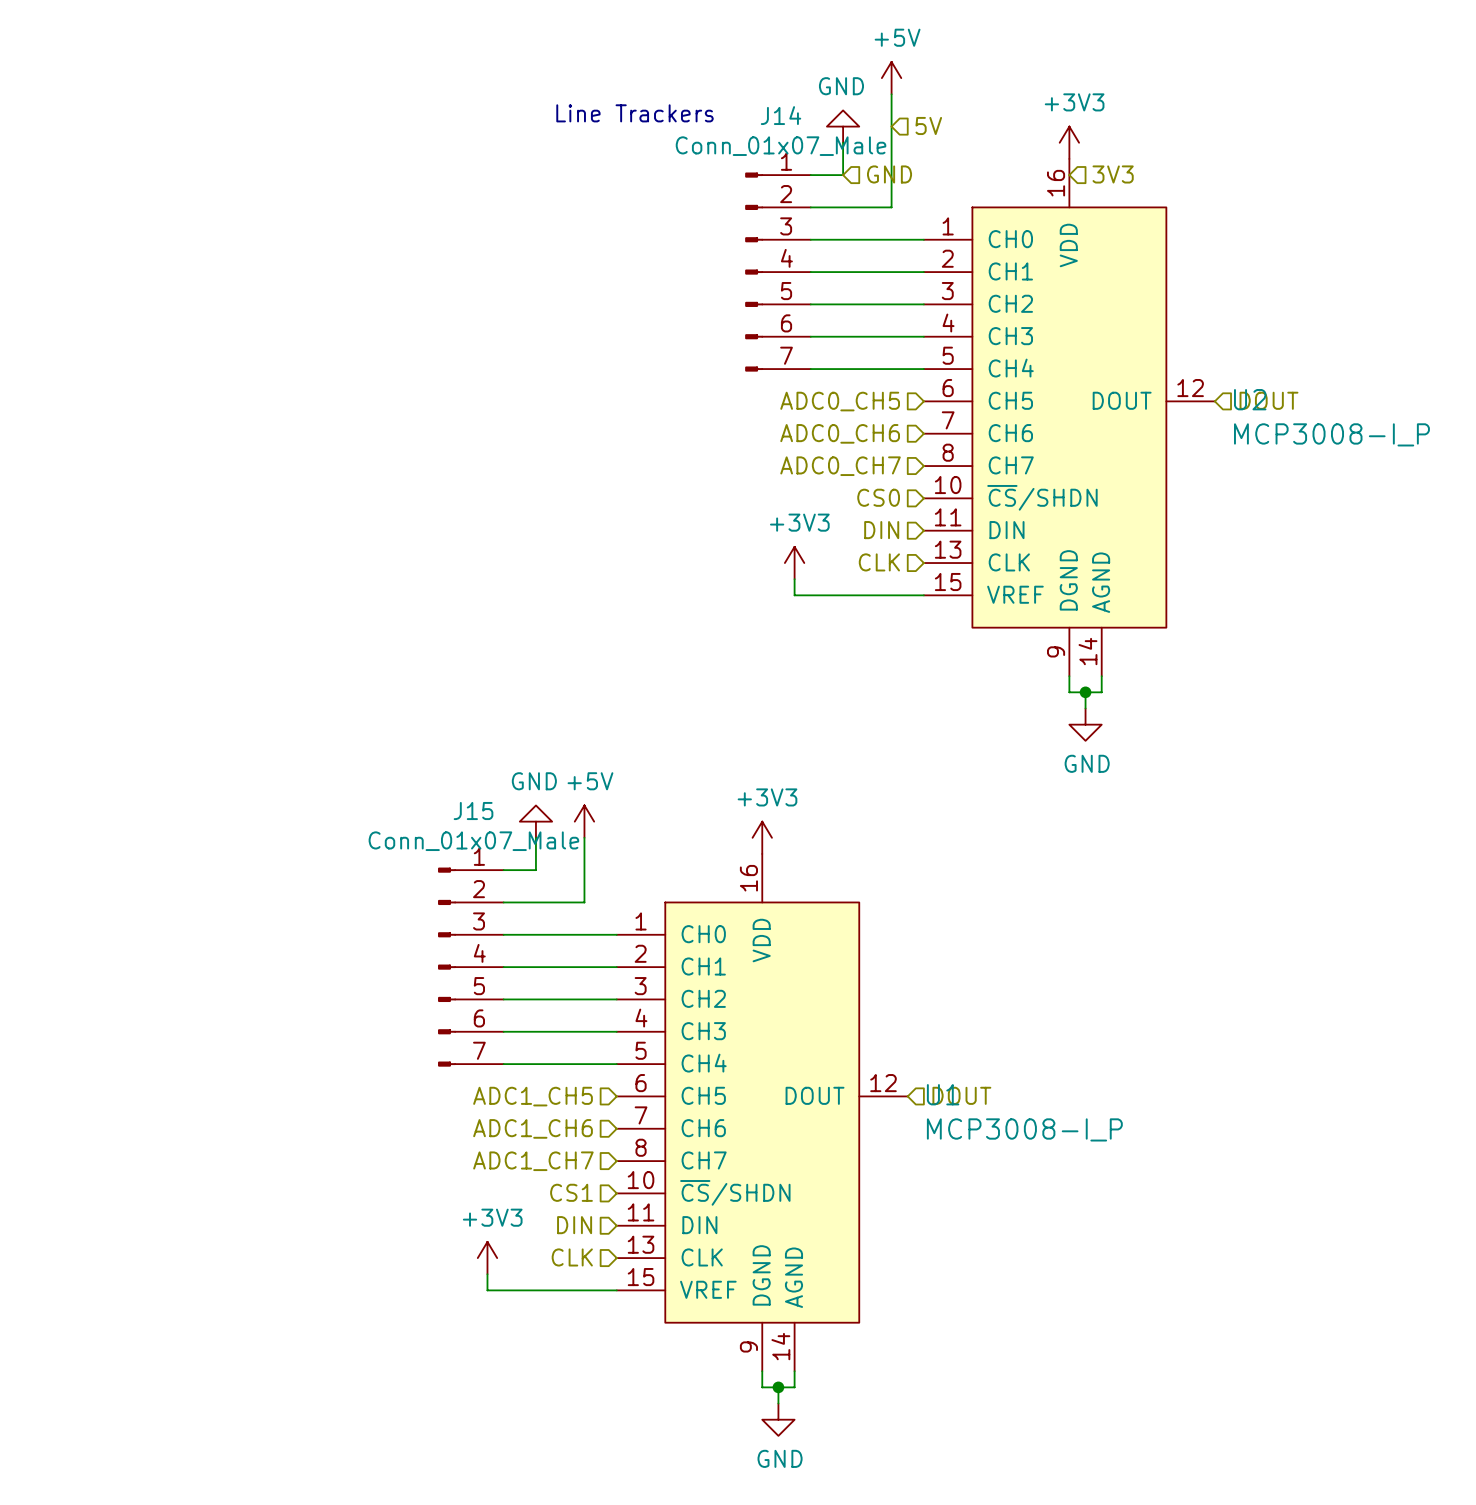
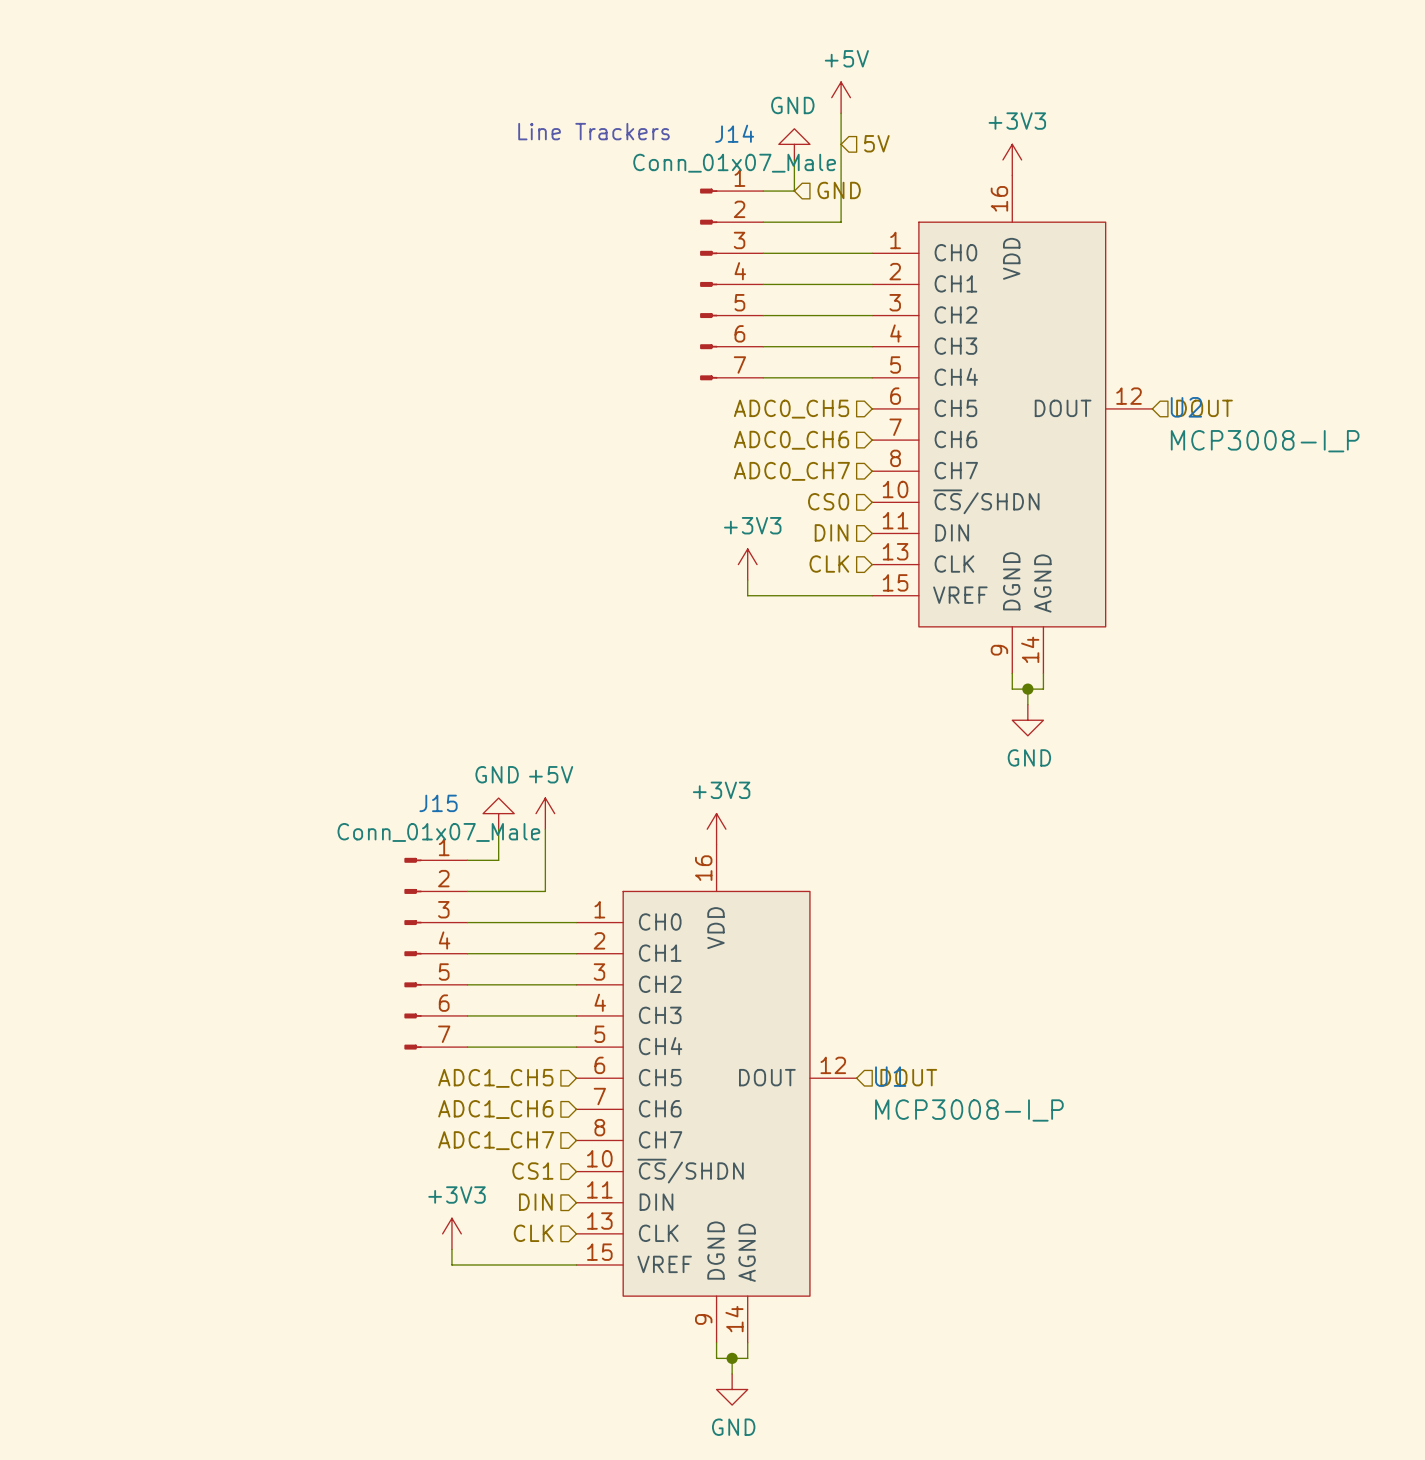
hierarchical label: 3V3 (1113, 174) -> none

